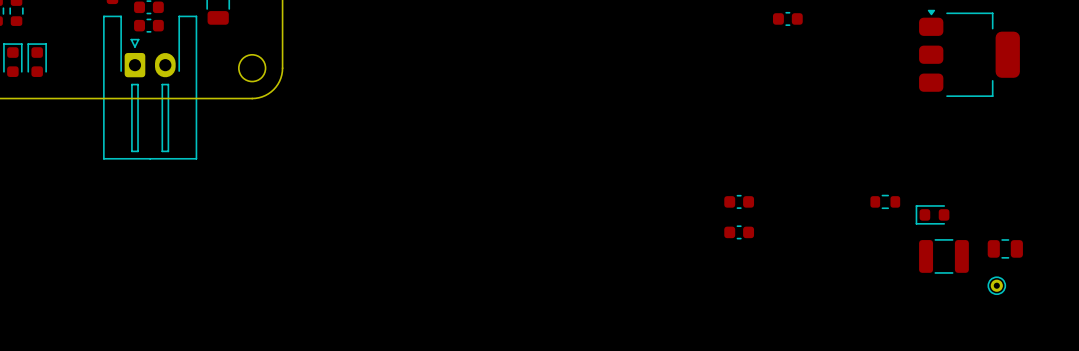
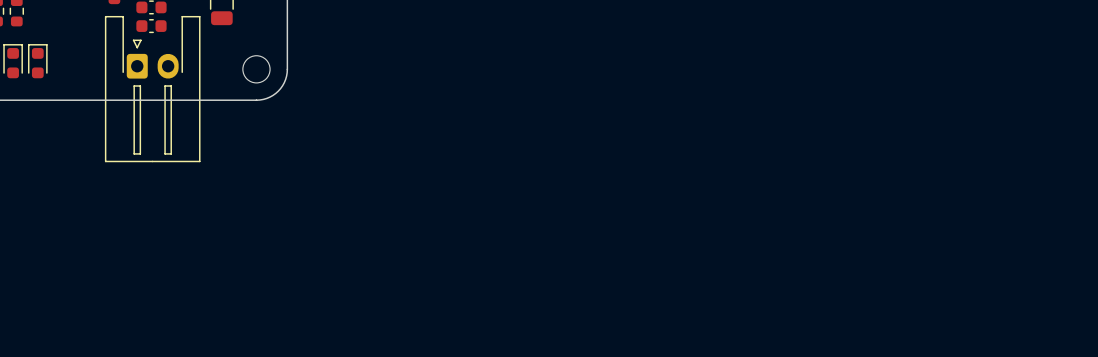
part: (787, 18) -> none
part: (969, 53) -> none
part: (739, 201) -> none
part: (885, 201) -> none
part: (932, 214) -> none
part: (739, 232) -> none
part: (1005, 248) -> none
part: (943, 256) -> none
part: (996, 285) -> none

